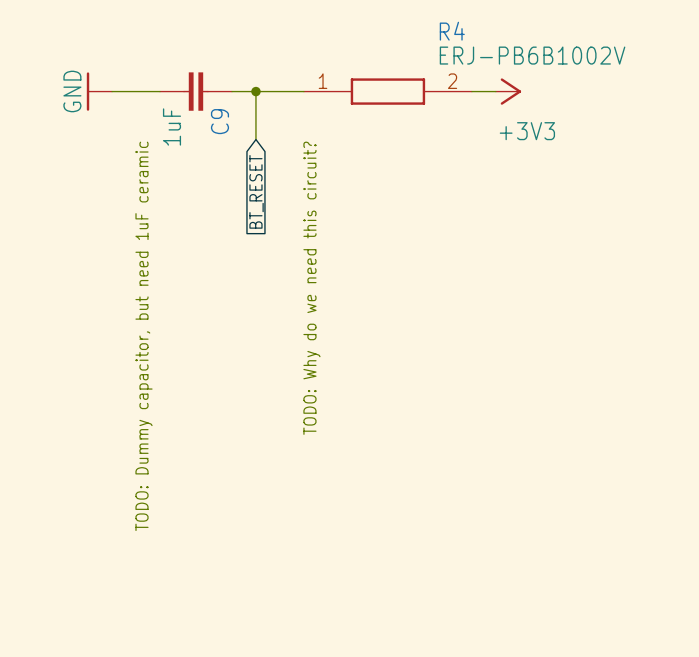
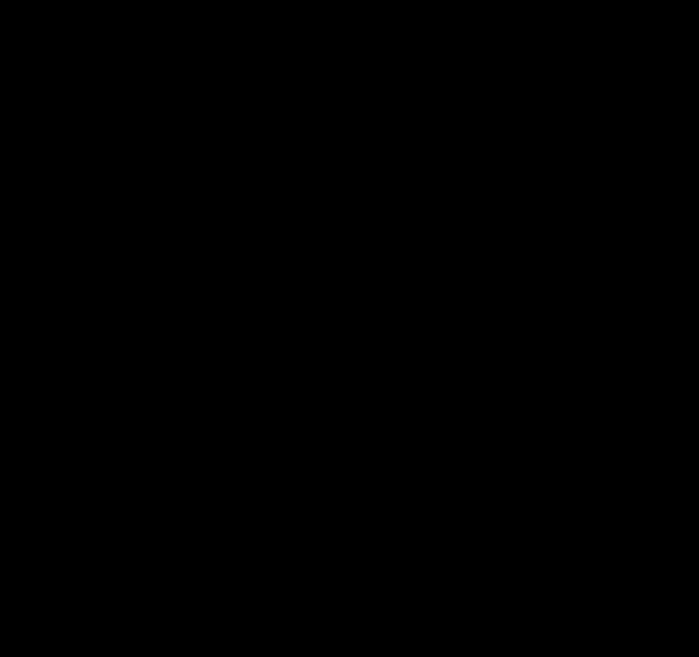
power symbol: GND (99, 91) -> none
wire: (112, 91) (159, 91) -> none
C9: 1uF (195, 91) -> none
wire: (231, 91) (303, 91) -> none
wire: (255, 91) (255, 139) -> none
junction: (255, 91) -> none
R4: ERJ-PB6B1002V (387, 91) -> none
wire: (471, 91) (495, 91) -> none
power symbol: +3V3 (508, 91) -> none
global label: BT_RESET (256, 191) -> none
text: TODO: Why do we need this circuit? (311, 288) -> none
text: TODO: Dummy capacitor, but need 1uF ceramic (144, 336) -> none

